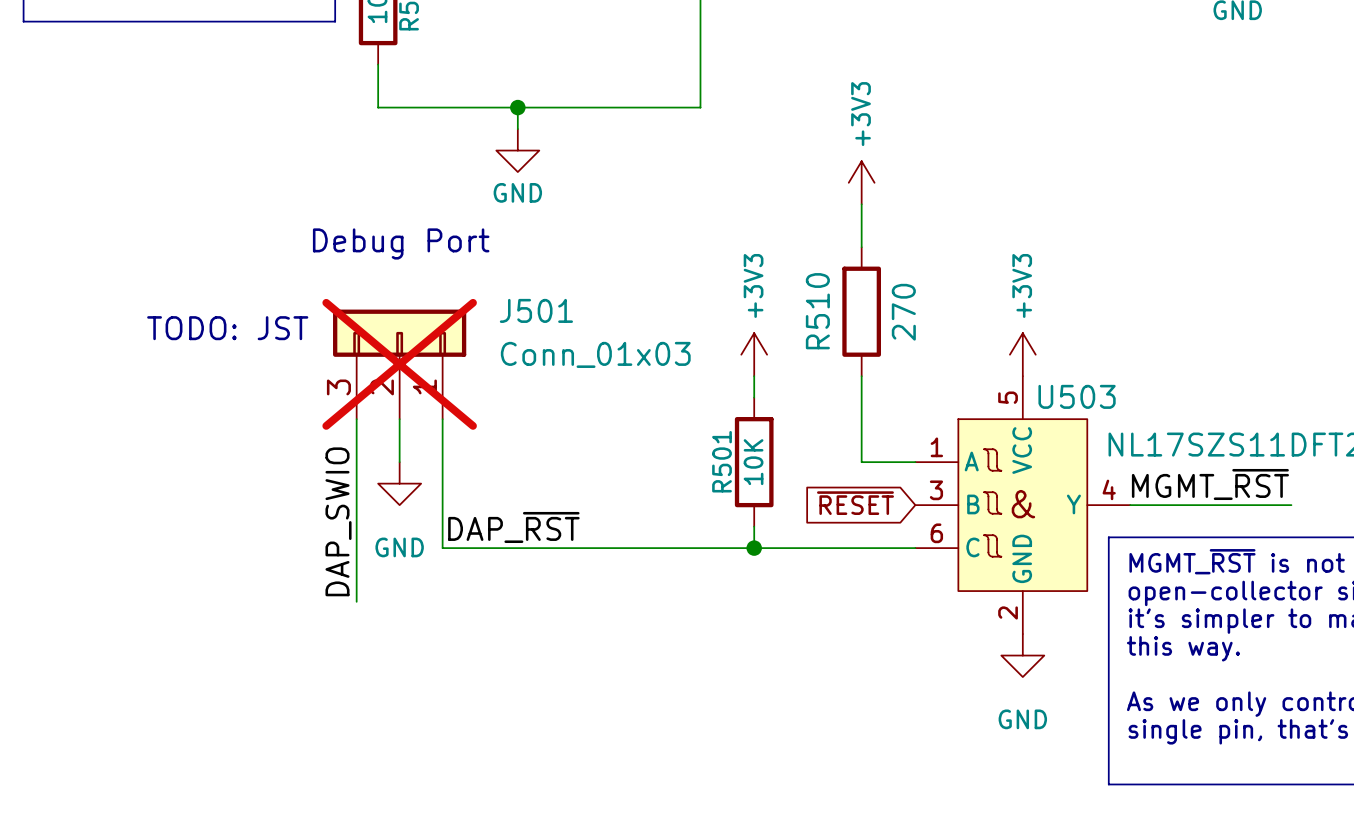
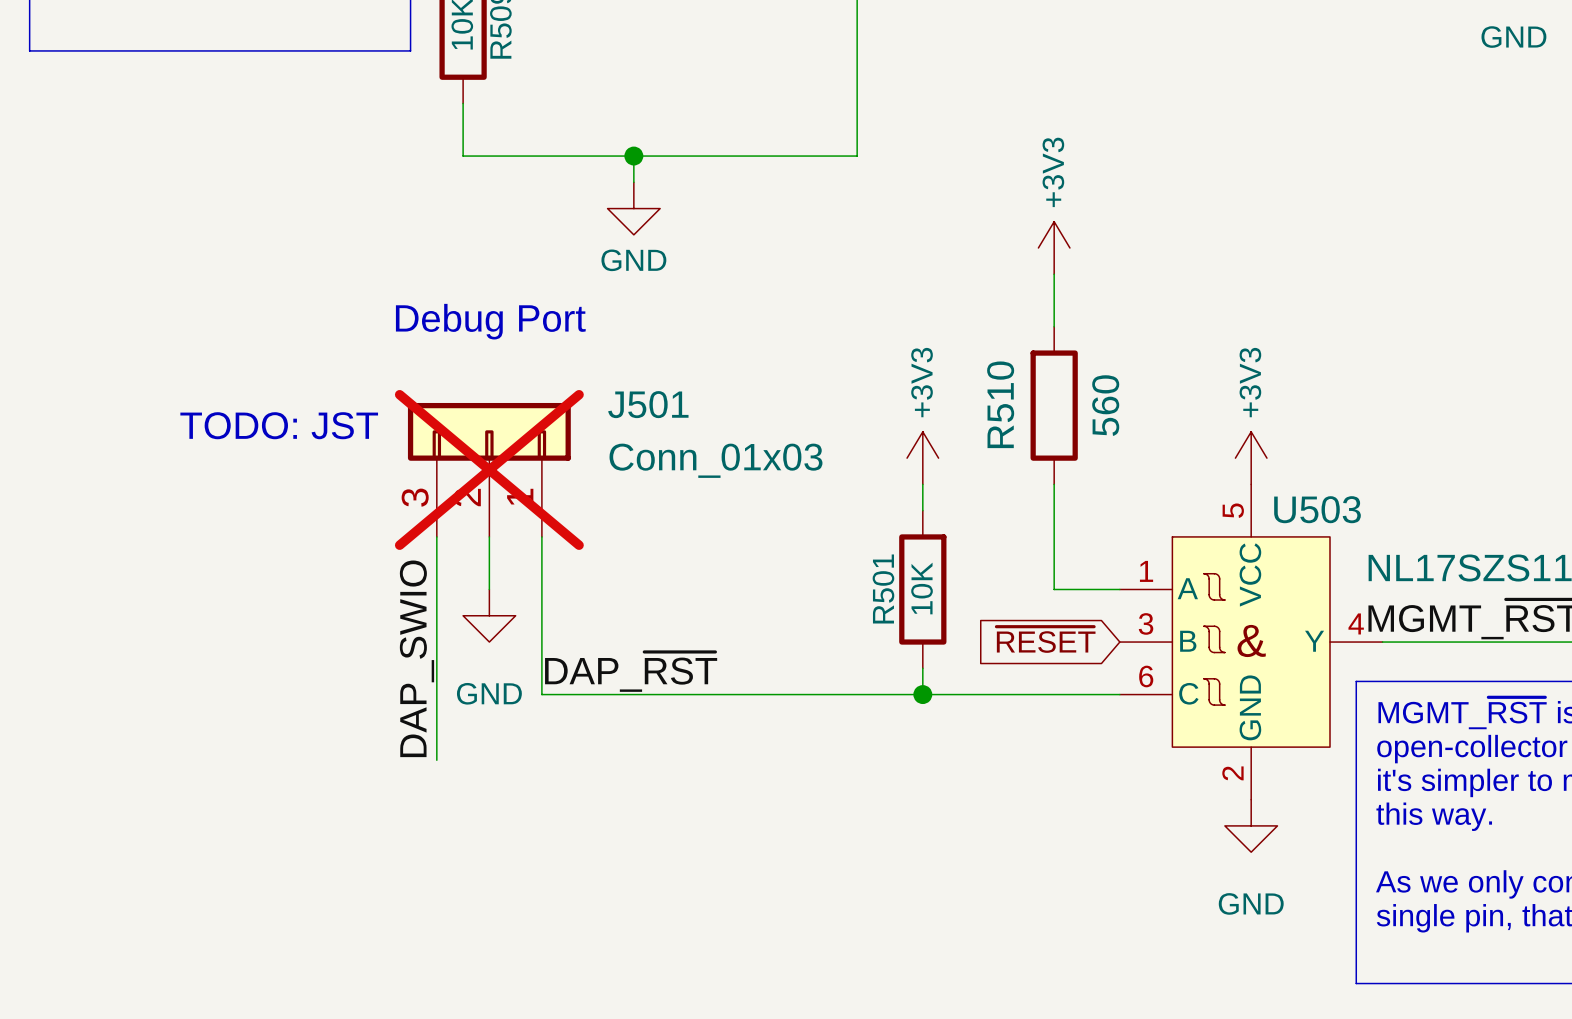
R510 value: 270 (903, 312) -> 560 (1105, 405)

